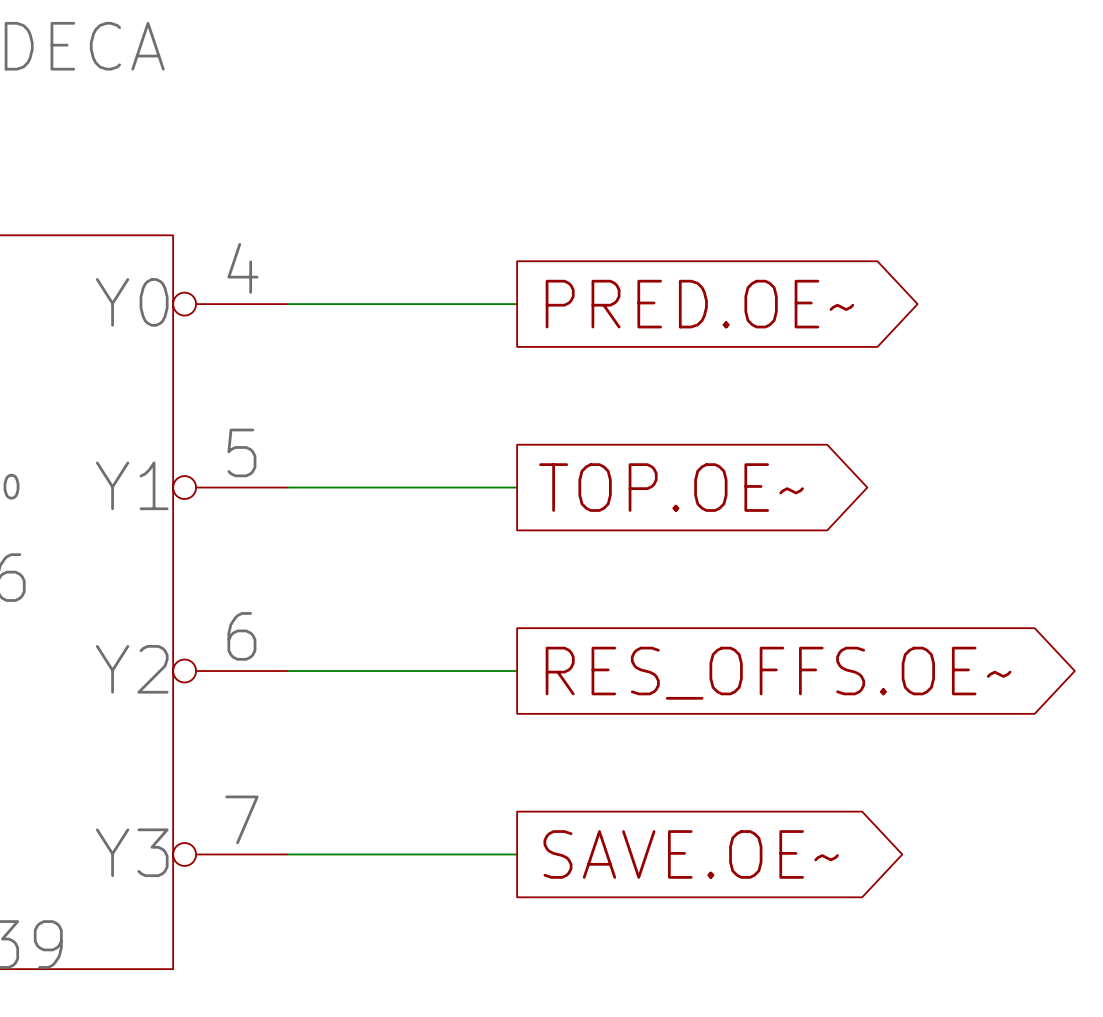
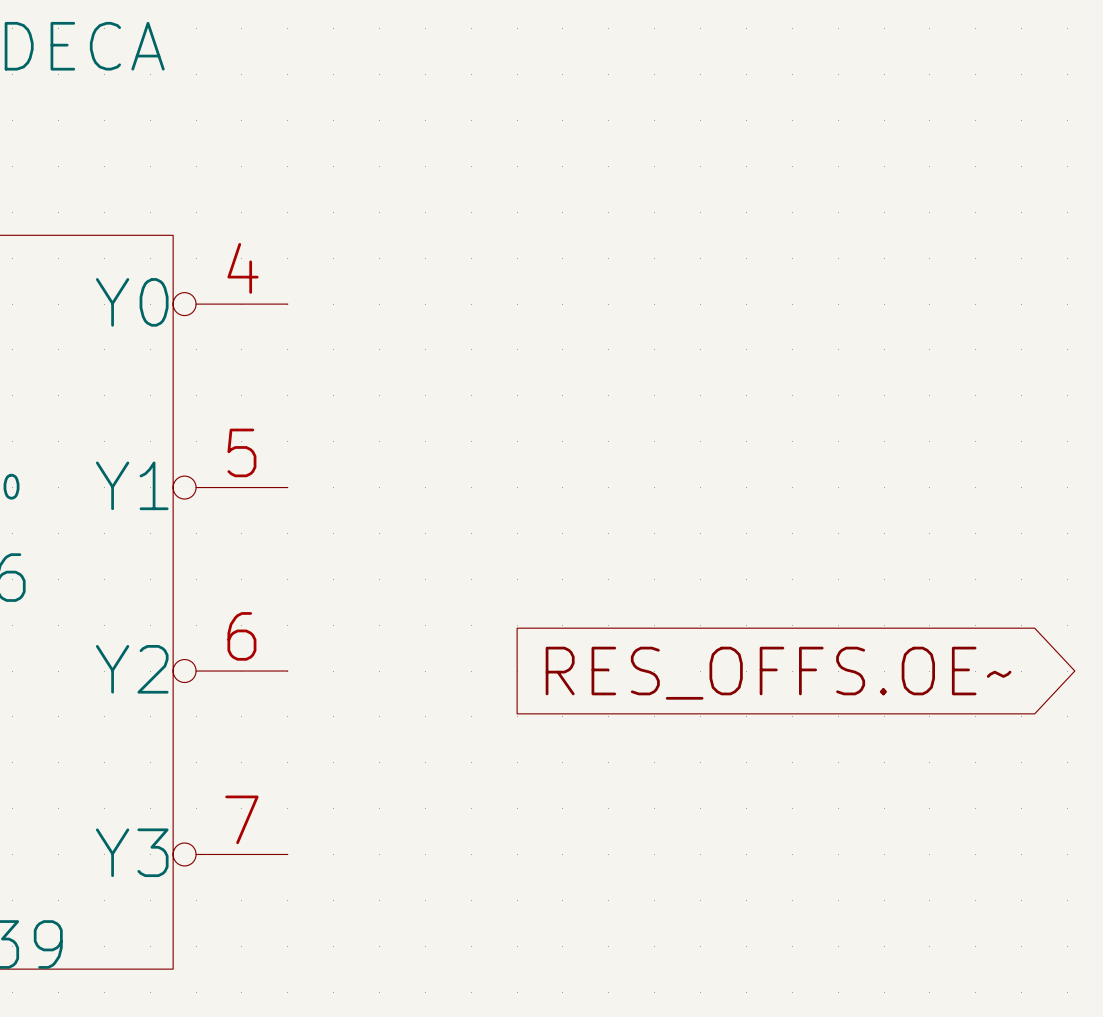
wire: (287, 304) (517, 304) -> none
global label: PRED.OE~ (699, 304) -> none
wire: (287, 487) (517, 487) -> none
global label: TOP.OE~ (671, 487) -> none
wire: (287, 671) (517, 671) -> none
wire: (287, 854) (517, 854) -> none
global label: SAVE.OE~ (691, 854) -> none

